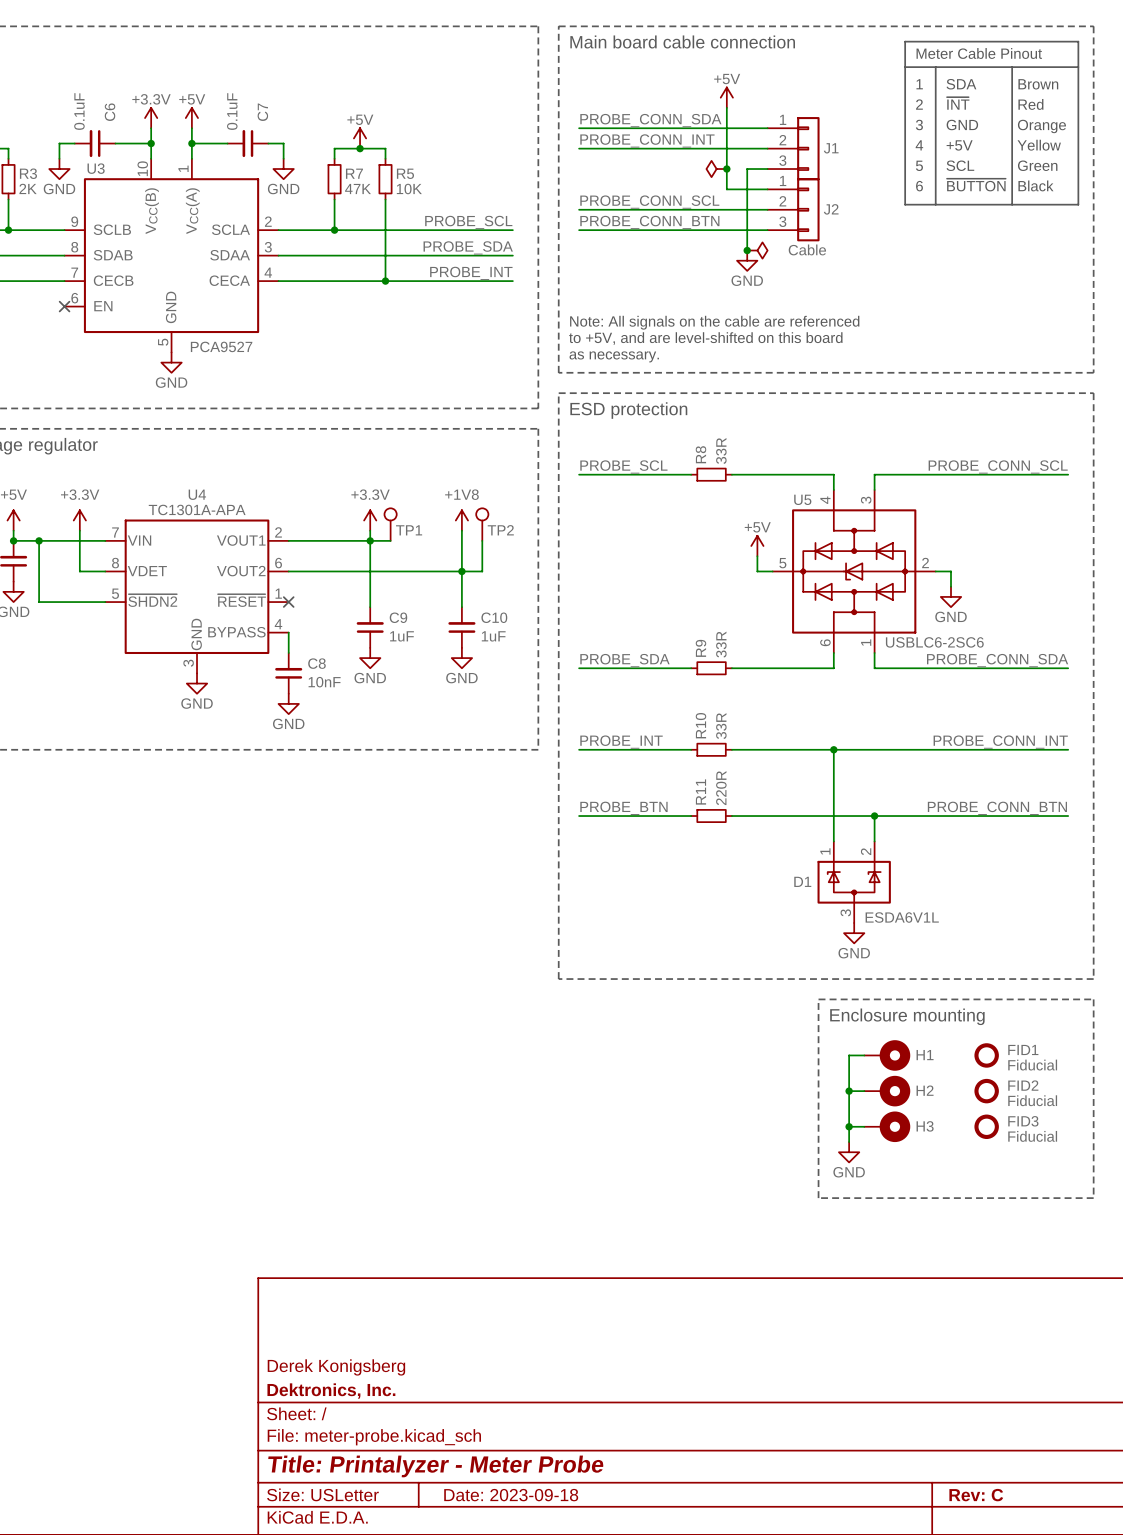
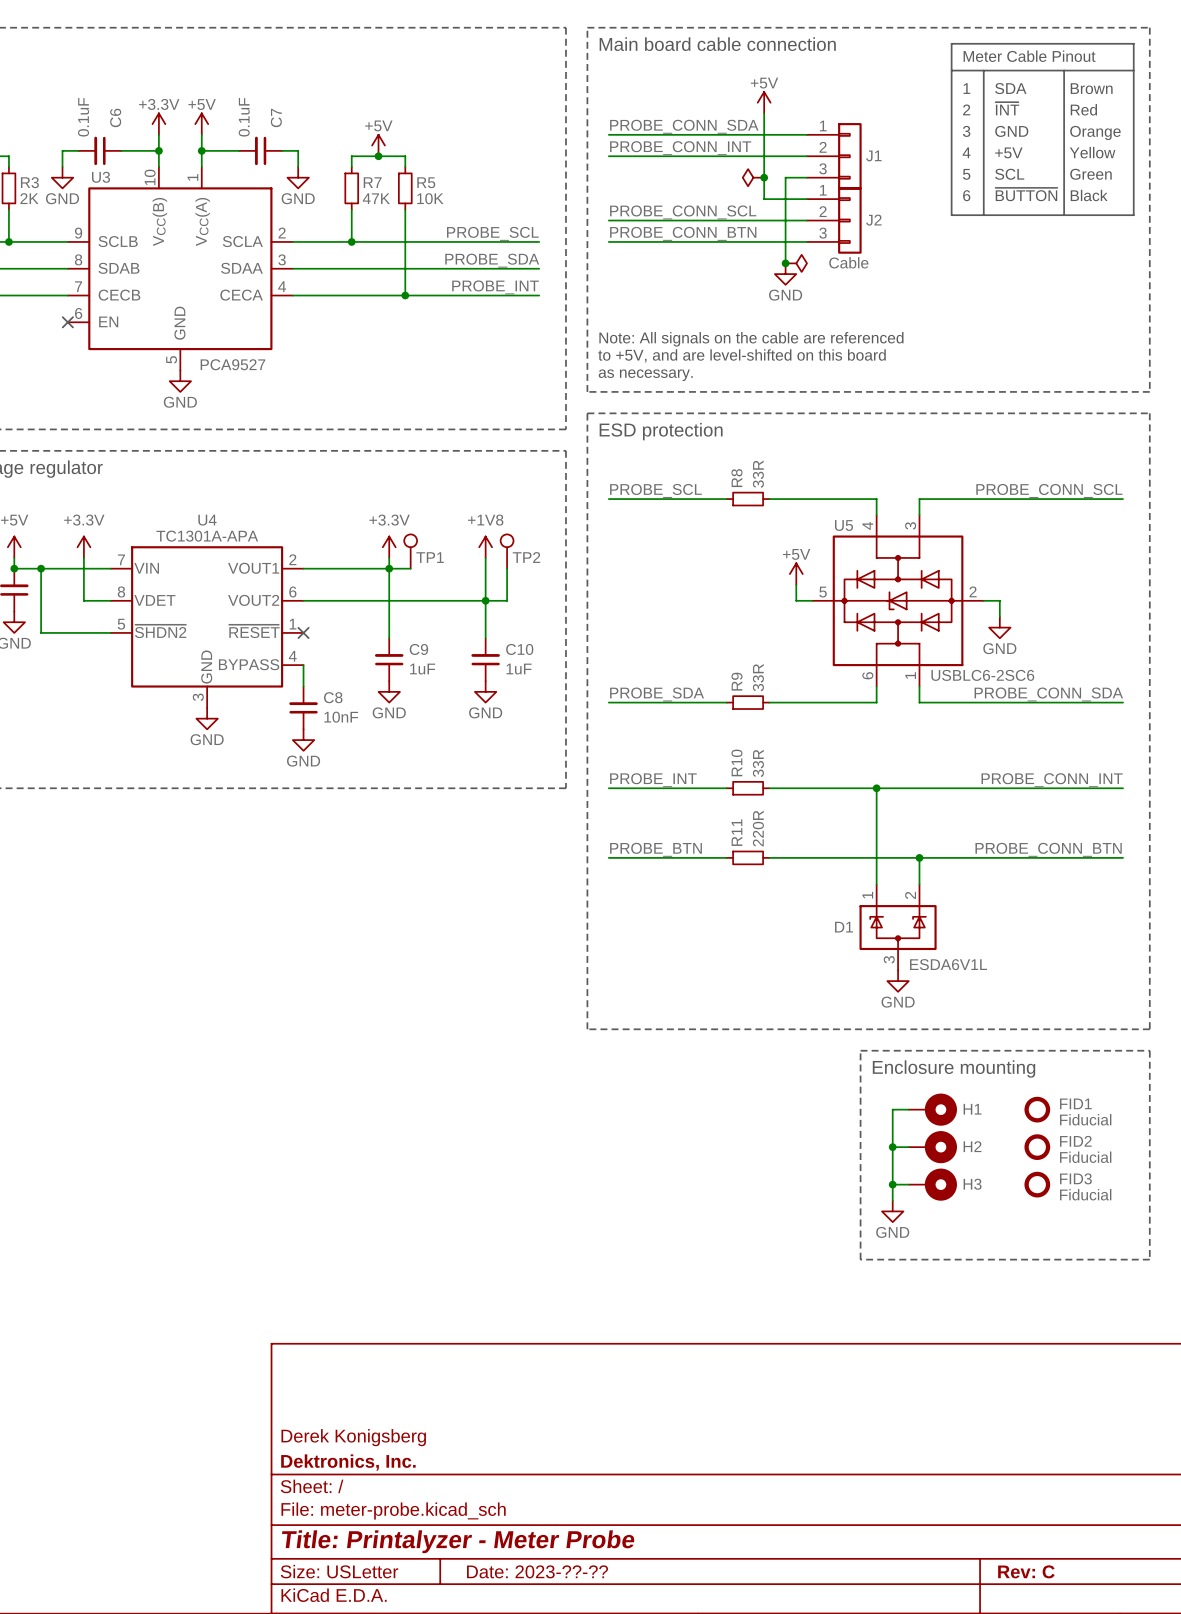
title block: Date: 2023-09-18 (511, 1495) -> Date: 2023-??-?? (537, 1571)

